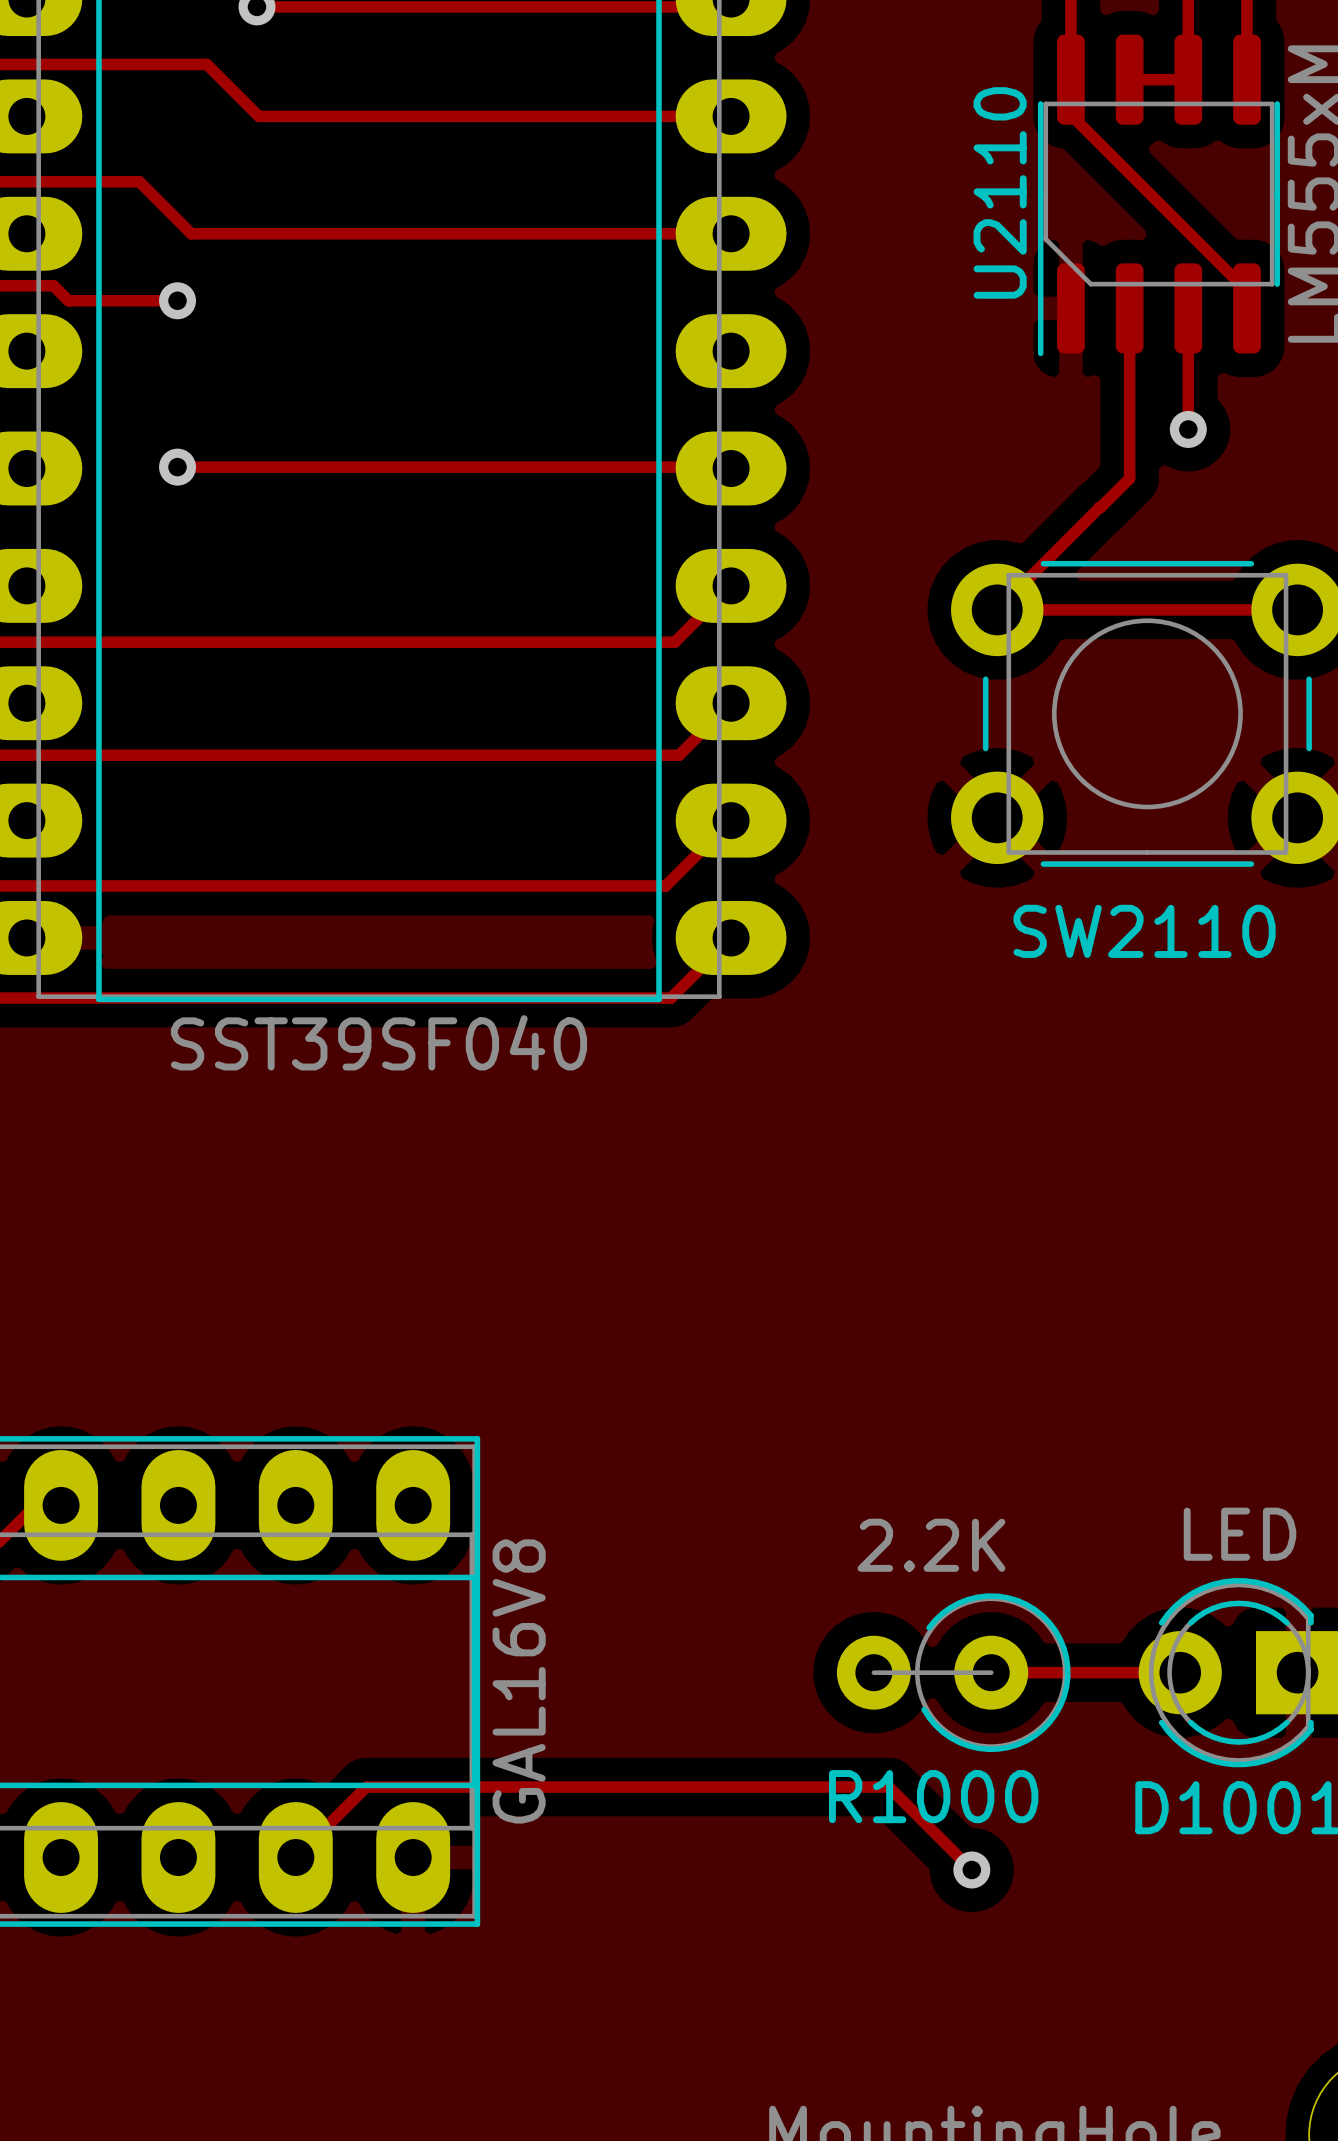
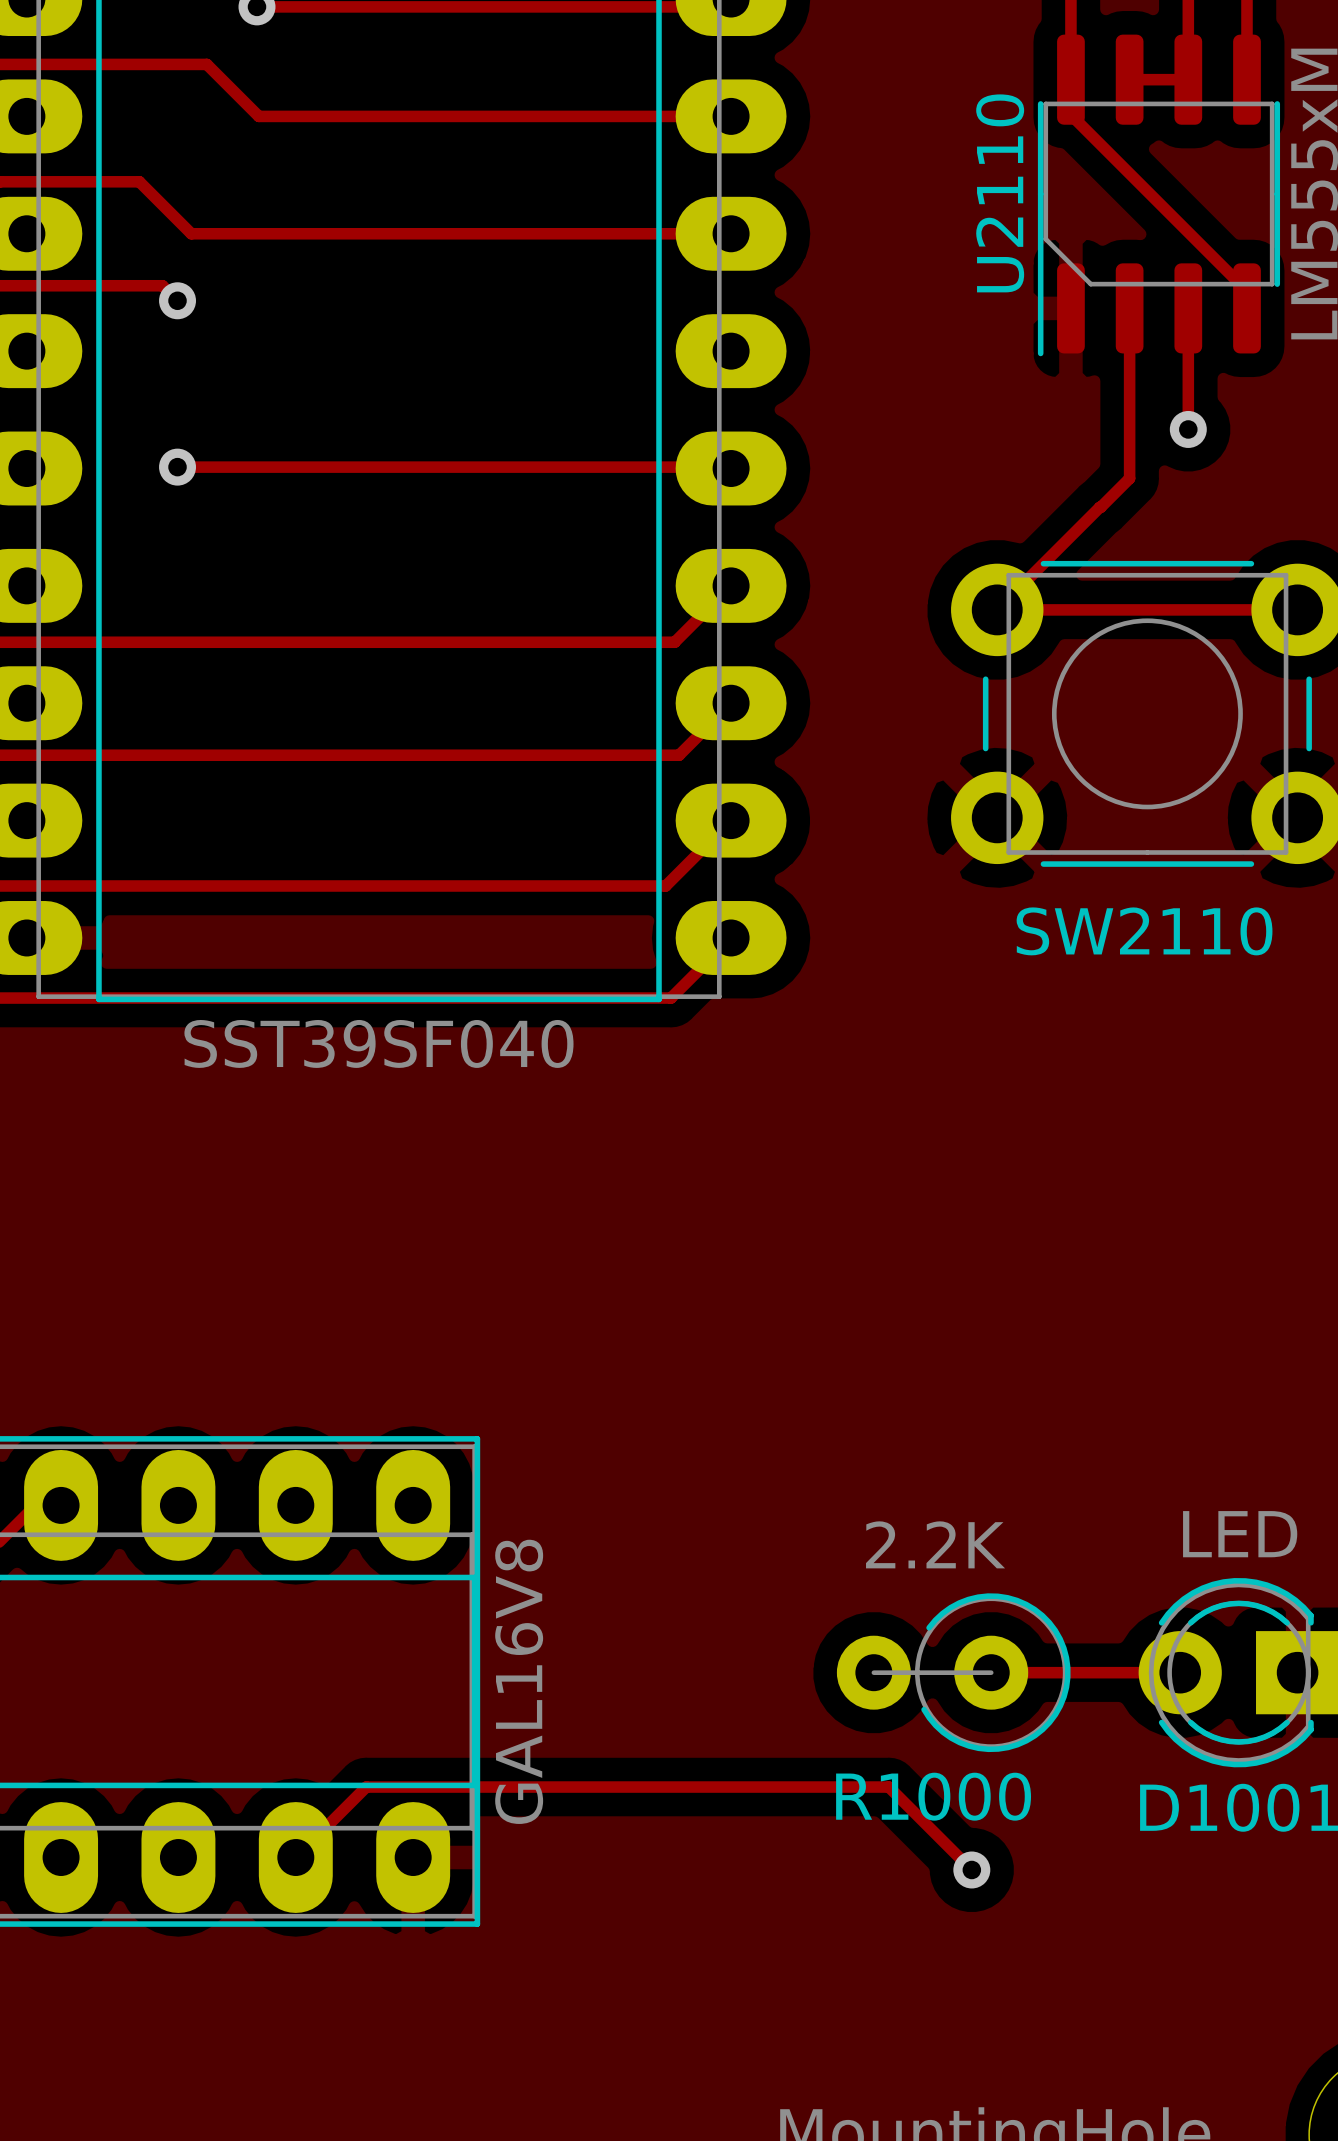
track: (53, 285) (68, 300) (177, 300) -> (53, 285) (162, 285) (177, 300)

